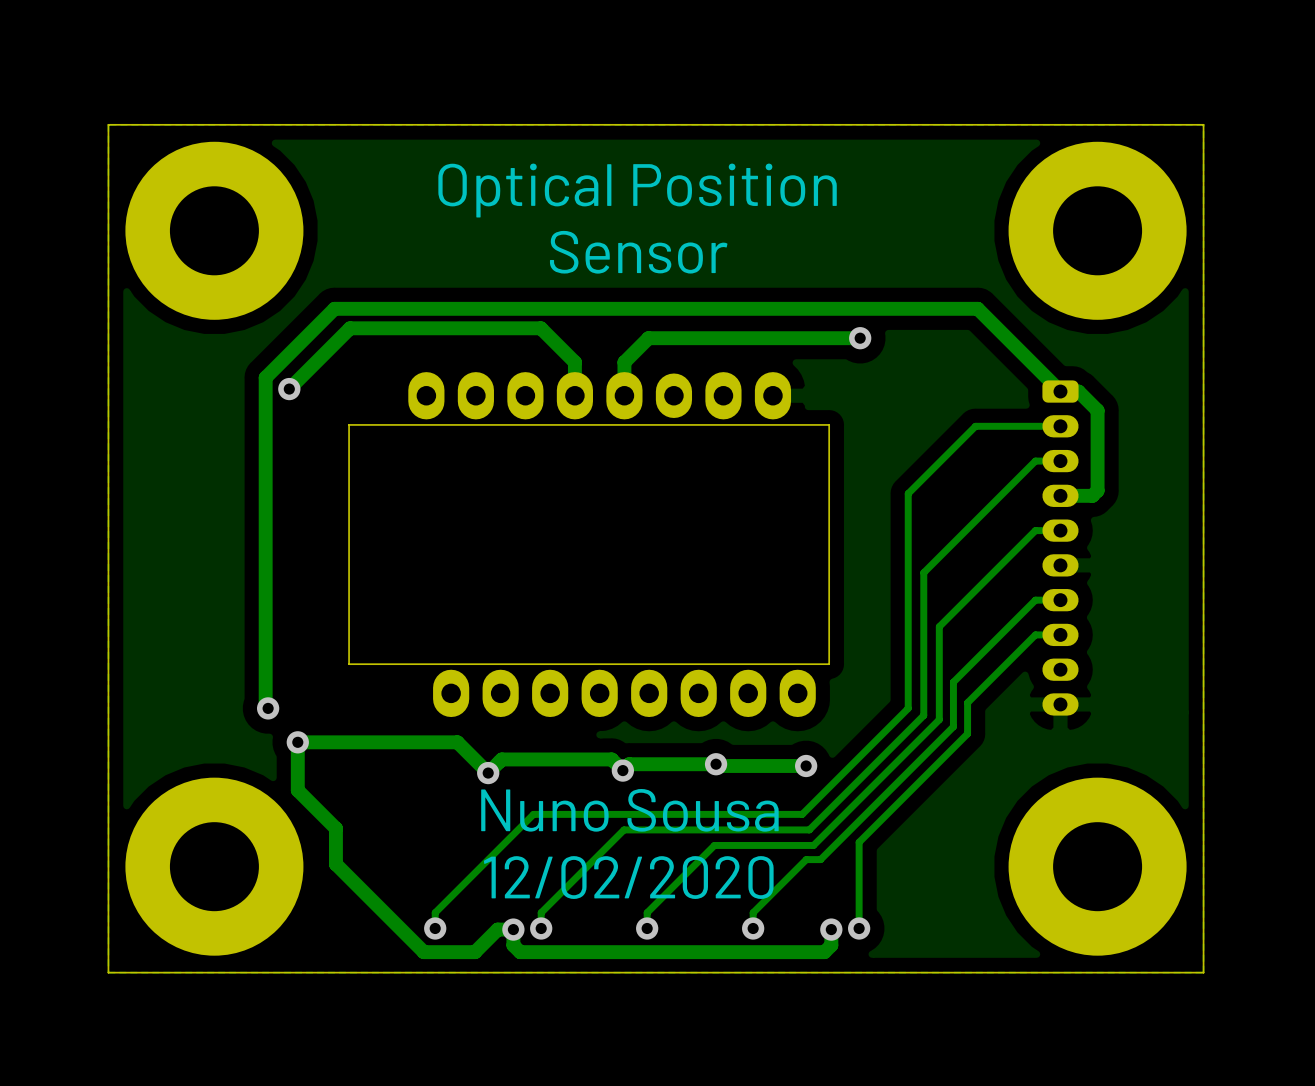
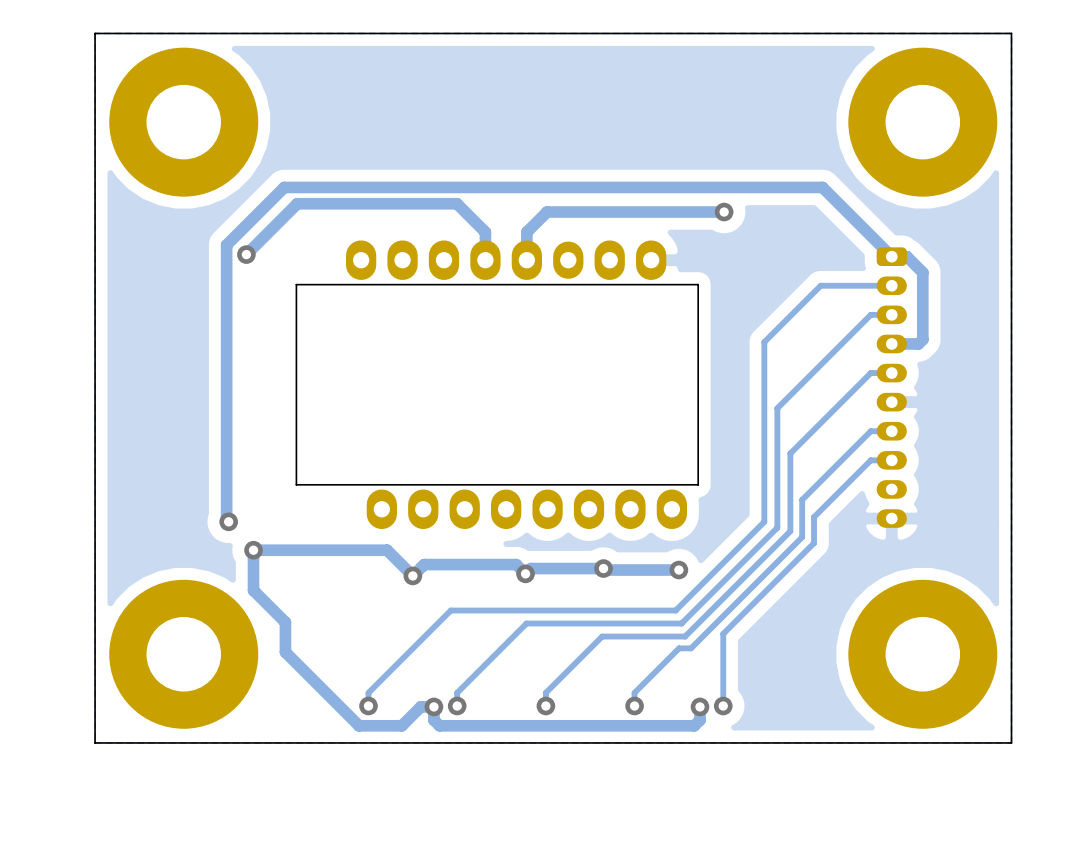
text: Optical Position (637, 190) -> none
text: Sensor (638, 252) -> none
text: Nuno Sousa (629, 810) -> none
text: 12/02/2020 (628, 877) -> none

